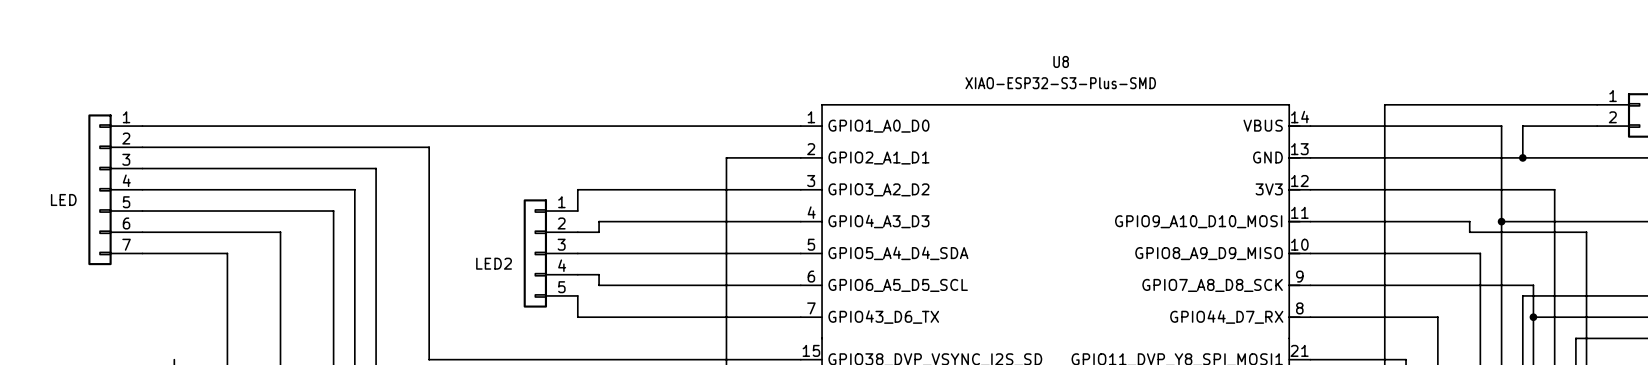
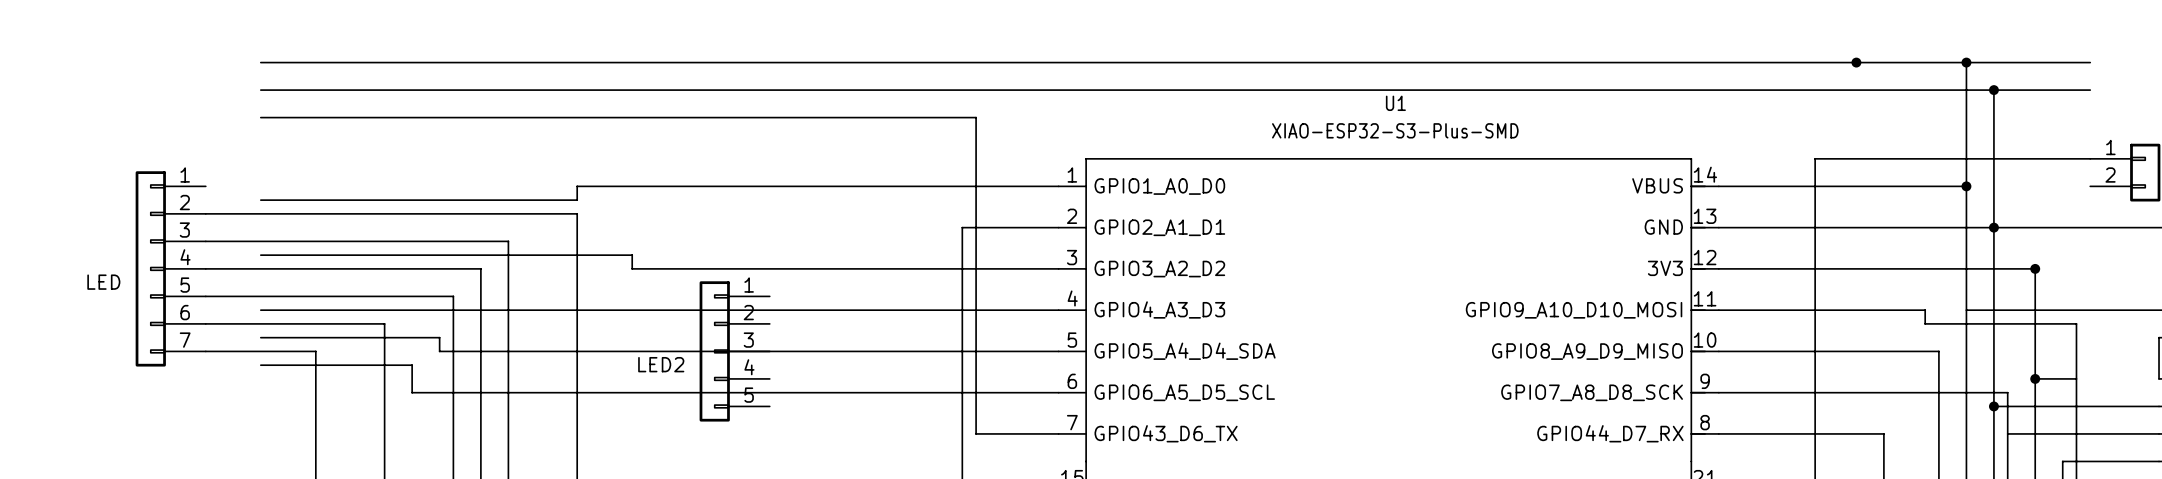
wire: none -> (260, 62) (2090, 62)
junction: none -> (1856, 62)
wire: none -> (1966, 62) (1966, 186)
junction: none -> (1966, 62)
wire: none -> (260, 90) (2090, 90)
junction: none -> (1993, 90)
U8 name: U8 (1061, 61) -> U1 (1395, 103)
wire: (142, 126) (429, 126) -> (260, 200) (577, 200) (577, 186)
junction: none -> (1966, 186)
wire: (1522, 126) (1597, 126) -> (1993, 186) (1993, 90)
wire: none -> (1993, 227) (1993, 406)
wire: (577, 189) (577, 211) -> (769, 268) (632, 268) (632, 255) (260, 255)
junction: none -> (2035, 268)
wire: (599, 221) (599, 232) (577, 232) -> (797, 310) (260, 310)
junction: (1501, 221) -> none
wire: none -> (260, 337) (439, 337) (439, 351) (769, 351)
wire: (577, 274) (599, 274) (599, 285) -> (260, 365) (412, 365) (412, 392) (797, 392)
wire: none -> (2035, 378) (2076, 378)
junction: none -> (2035, 378)
wire: (577, 295) (577, 317) (737, 317) -> (260, 117) (976, 117) (976, 433)
junction: none -> (1993, 406)
junction: (1533, 317) -> none

